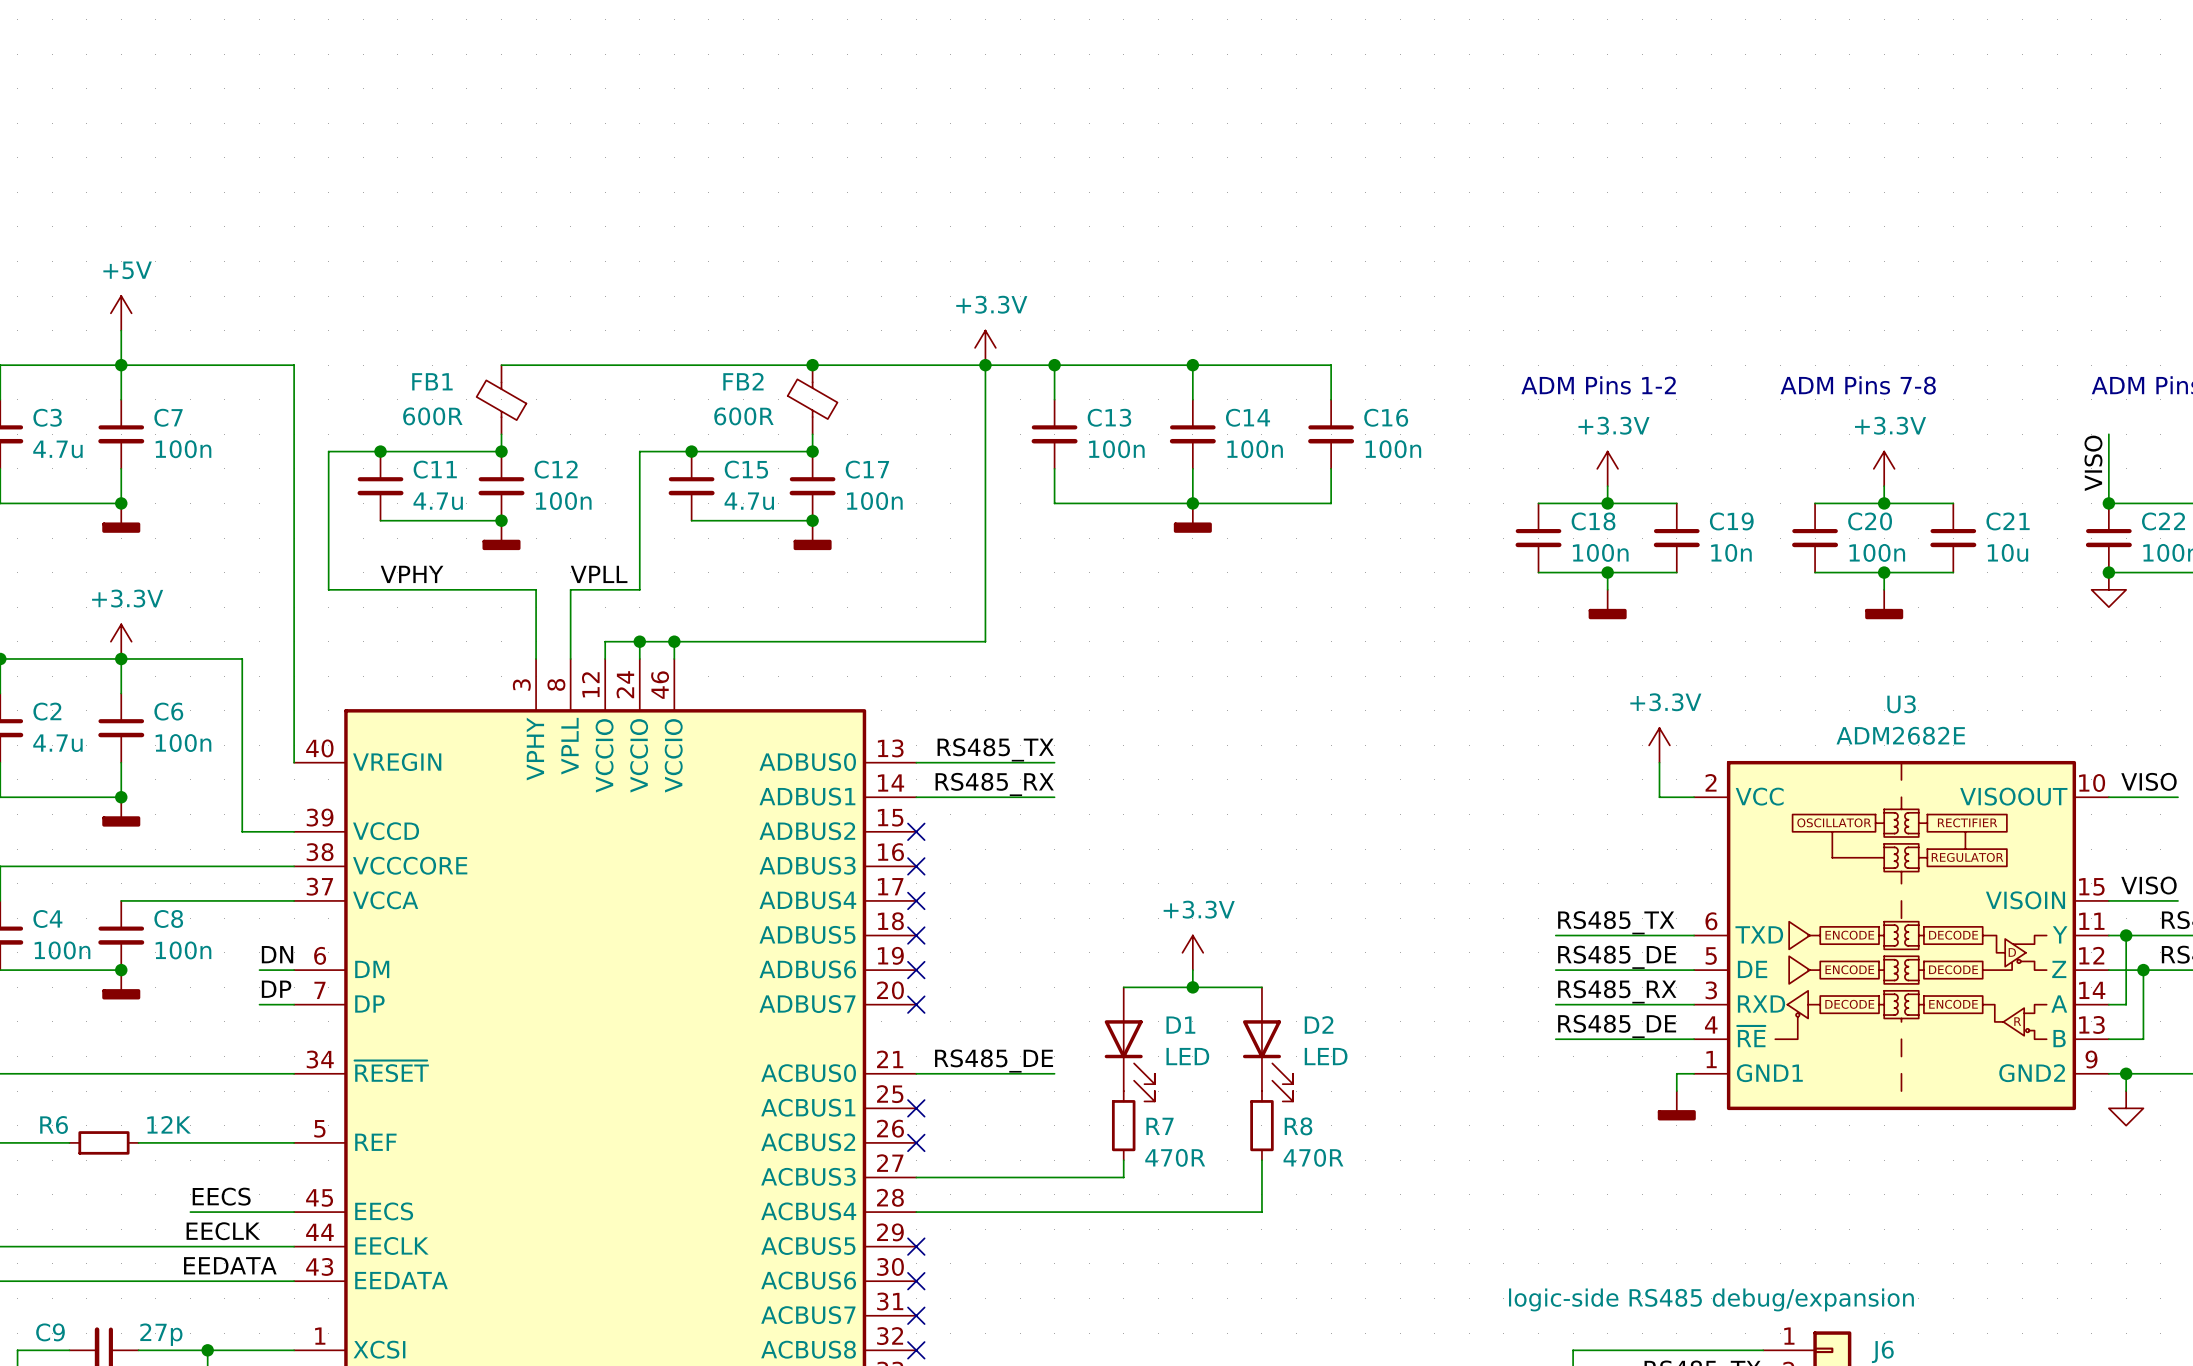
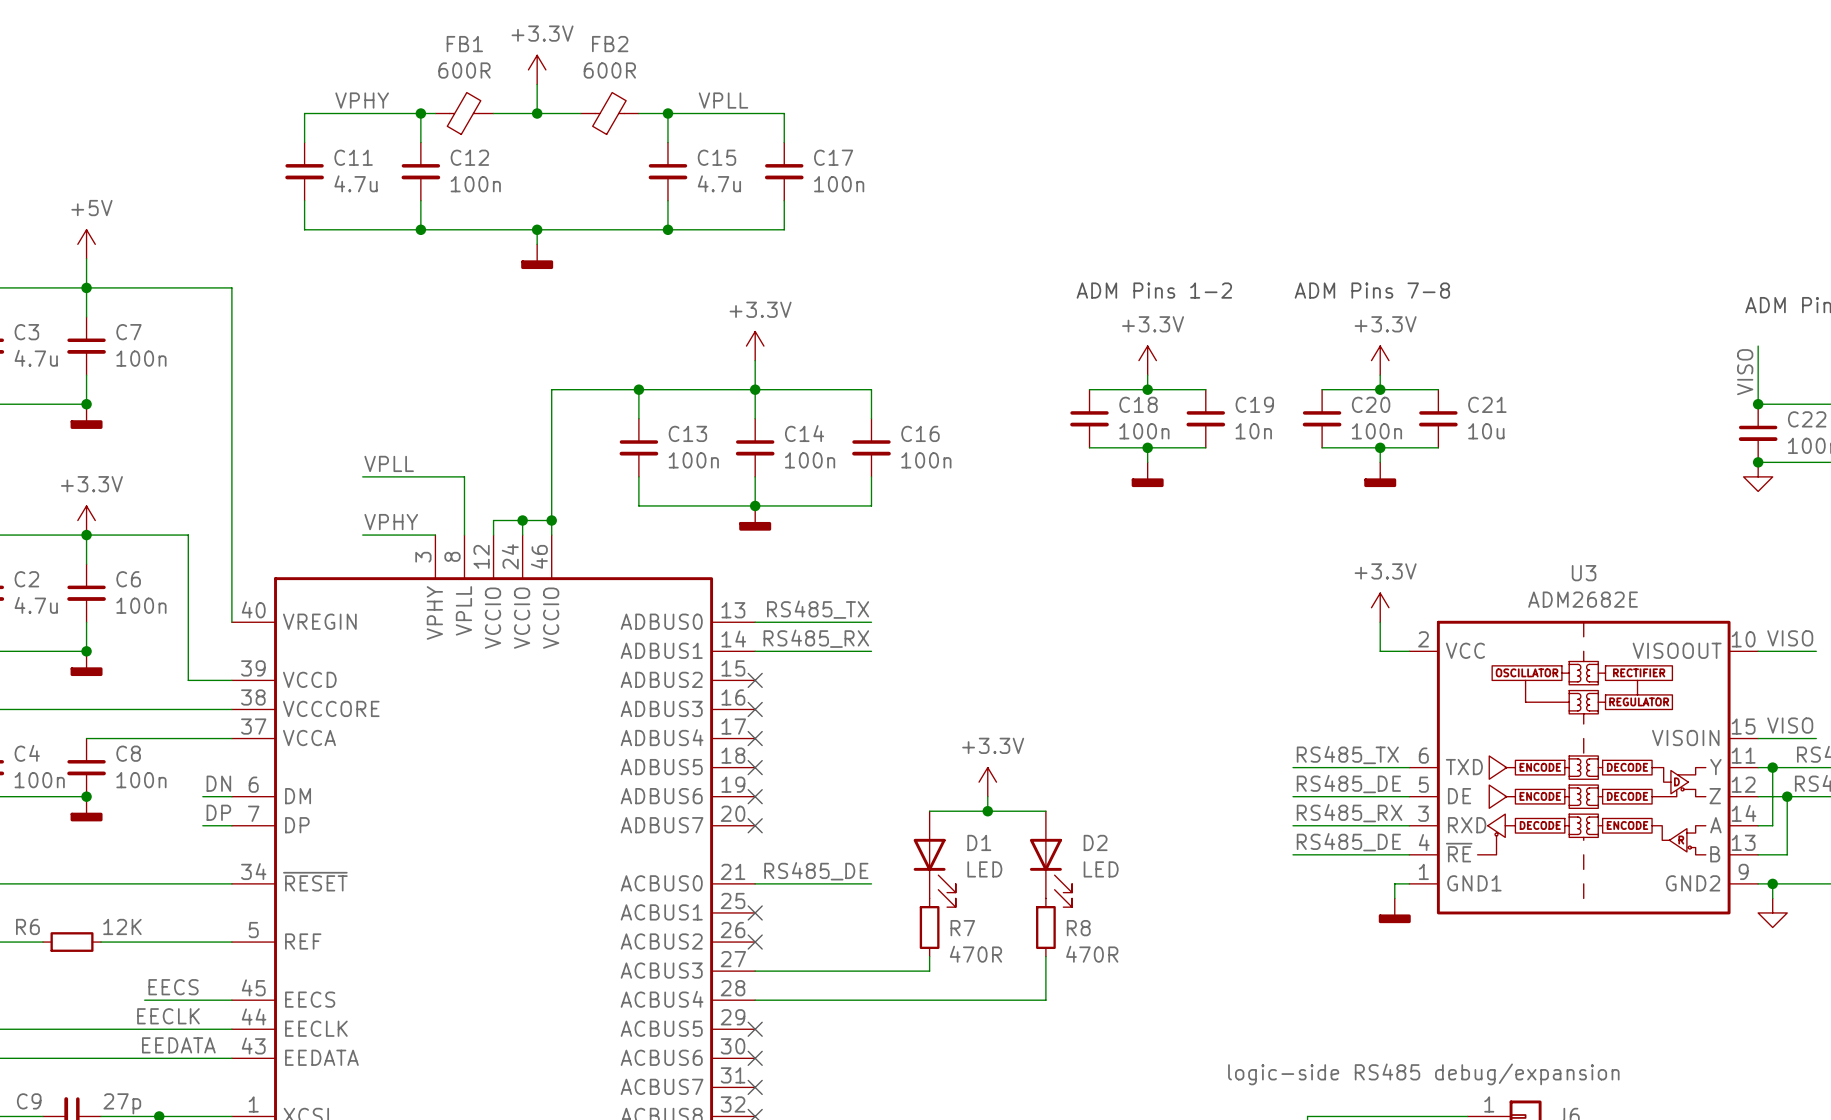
power symbol: none -> +3.3V (537, 69)
wire: none -> (537, 84) (537, 113)
label: none -> VPHY (362, 100)
label: none -> VPLL (723, 100)
wire: none -> (420, 113) (420, 142)
junction: none -> (420, 113)
wire: none -> (435, 113) (304, 113) (304, 142)
wire: none -> (493, 113) (580, 113)
junction: none -> (537, 113)
wire: none -> (638, 113) (784, 113) (784, 142)
wire: none -> (667, 113) (667, 142)
junction: none -> (667, 113)
wire: none -> (304, 200) (304, 229) (784, 229) (784, 200)
wire: none -> (420, 200) (420, 229)
wire: none -> (667, 200) (667, 229)
junction: none -> (420, 229)
wire: none -> (537, 229) (537, 244)
junction: none -> (537, 229)
junction: none -> (667, 229)
power symbol: none -> (537, 256)
power symbol position: +3.3V (985, 347) -> +3.3V (755, 346)
wire: (501, 365) (1331, 365) (1331, 399) -> none
junction: (812, 365) -> none
wire: (985, 365) (985, 641) (674, 641) -> (871, 389) (551, 389) (551, 520)
junction: (985, 365) -> none
wire: (1054, 365) (1054, 399) -> (638, 389) (638, 418)
junction: (1054, 365) -> none
wire: (1192, 365) (1192, 399) -> none
junction: (1192, 365) -> none
FB2 name position: FB2 (743, 381) -> FB2 (610, 44)
text position: ADM Pins 1-2 (1598, 385) -> ADM Pins 1-2 (1154, 290)
text position: ADM Pins 7-8 (1858, 385) -> ADM Pins 7-8 (1372, 290)
FB1 position: (501, 399) -> (464, 113)
FB2 rotation: 0° (812, 399) -> 90° counterclockwise (609, 113)
FB2 position: (812, 399) -> (609, 113)
FB1 rotation: 0° (501, 400) -> 90° clockwise (464, 113)
FB2 value position: 600R (743, 416) -> 600R (609, 70)
wire: (501, 434) (501, 451) (328, 451) (328, 589) (449, 589) -> none
wire: (812, 434) (812, 451) (639, 451) (639, 589) (570, 589) -> none
C13 position: (1054, 434) -> (638, 447)
C14 position: (1192, 434) -> (755, 447)
C16 position: (1331, 434) -> (871, 447)
junction: (380, 451) -> none
junction: (501, 451) -> none
junction: (691, 451) -> none
junction: (812, 451) -> none
wire: none -> (755, 360) (755, 418)
power symbol: none -> +3.3V (1147, 360)
wire: (1054, 468) (1054, 486) -> none
wire: (1192, 468) (1192, 503) -> (755, 476) (755, 505)
wire: (1331, 468) (1331, 503) (1054, 503) -> (871, 418) (871, 404)
power symbol position: +3.3V (1607, 468) -> +3.3V (1380, 360)
power symbol: +3.3V (1884, 468) -> none
C11 position: (380, 486) -> (304, 171)
C12 position: (501, 486) -> (420, 171)
C15 position: (691, 486) -> (667, 171)
junction: none -> (638, 389)
C17 position: (812, 486) -> (784, 171)
junction: none -> (755, 389)
junction: none -> (1147, 389)
wire: (1607, 486) (1607, 503) -> (1147, 375) (1147, 389)
junction: none -> (1380, 389)
wire: (1884, 486) (1884, 503) -> (1380, 375) (1380, 389)
junction: (1192, 503) -> none
wire: (1538, 503) (1676, 503) -> (1089, 389) (1205, 389)
junction: (1607, 503) -> none
wire: (1815, 503) (1953, 503) -> (1322, 389) (1438, 389)
junction: (1884, 503) -> none
power symbol: (1192, 518) -> none
wire: (380, 520) (501, 520) -> none
junction: (501, 520) -> none
wire: (691, 520) (812, 520) -> none
junction: (812, 520) -> none
power symbol: (501, 535) -> none
power symbol: (812, 535) -> none
C18 position: (1538, 538) -> (1089, 418)
C19 position: (1676, 538) -> (1205, 418)
C20 position: (1815, 538) -> (1322, 418)
C21 position: (1953, 538) -> (1438, 418)
junction: none -> (1147, 447)
junction: none -> (1380, 447)
wire: (1538, 572) (1676, 572) -> (1089, 447) (1205, 447)
wire: (1607, 572) (1607, 589) -> (1147, 447) (1147, 462)
junction: (1607, 572) -> none
wire: (1815, 572) (1953, 572) -> (1322, 447) (1438, 447)
wire: (1884, 572) (1884, 589) -> (1380, 447) (1380, 462)
junction: (1884, 572) -> none
label position: VPHY (412, 574) -> VPHY (391, 522)
label position: VPLL (599, 574) -> VPLL (389, 463)
power symbol: none -> (1147, 474)
wire: (536, 589) (536, 658) -> (435, 476) (464, 476)
wire: none -> (638, 476) (638, 505) (871, 505) (871, 476)
power symbol position: (1607, 604) -> (1380, 474)
power symbol: (1884, 604) -> none
junction: none -> (755, 505)
power symbol: none -> (755, 518)
wire: none -> (362, 535) (435, 535)

